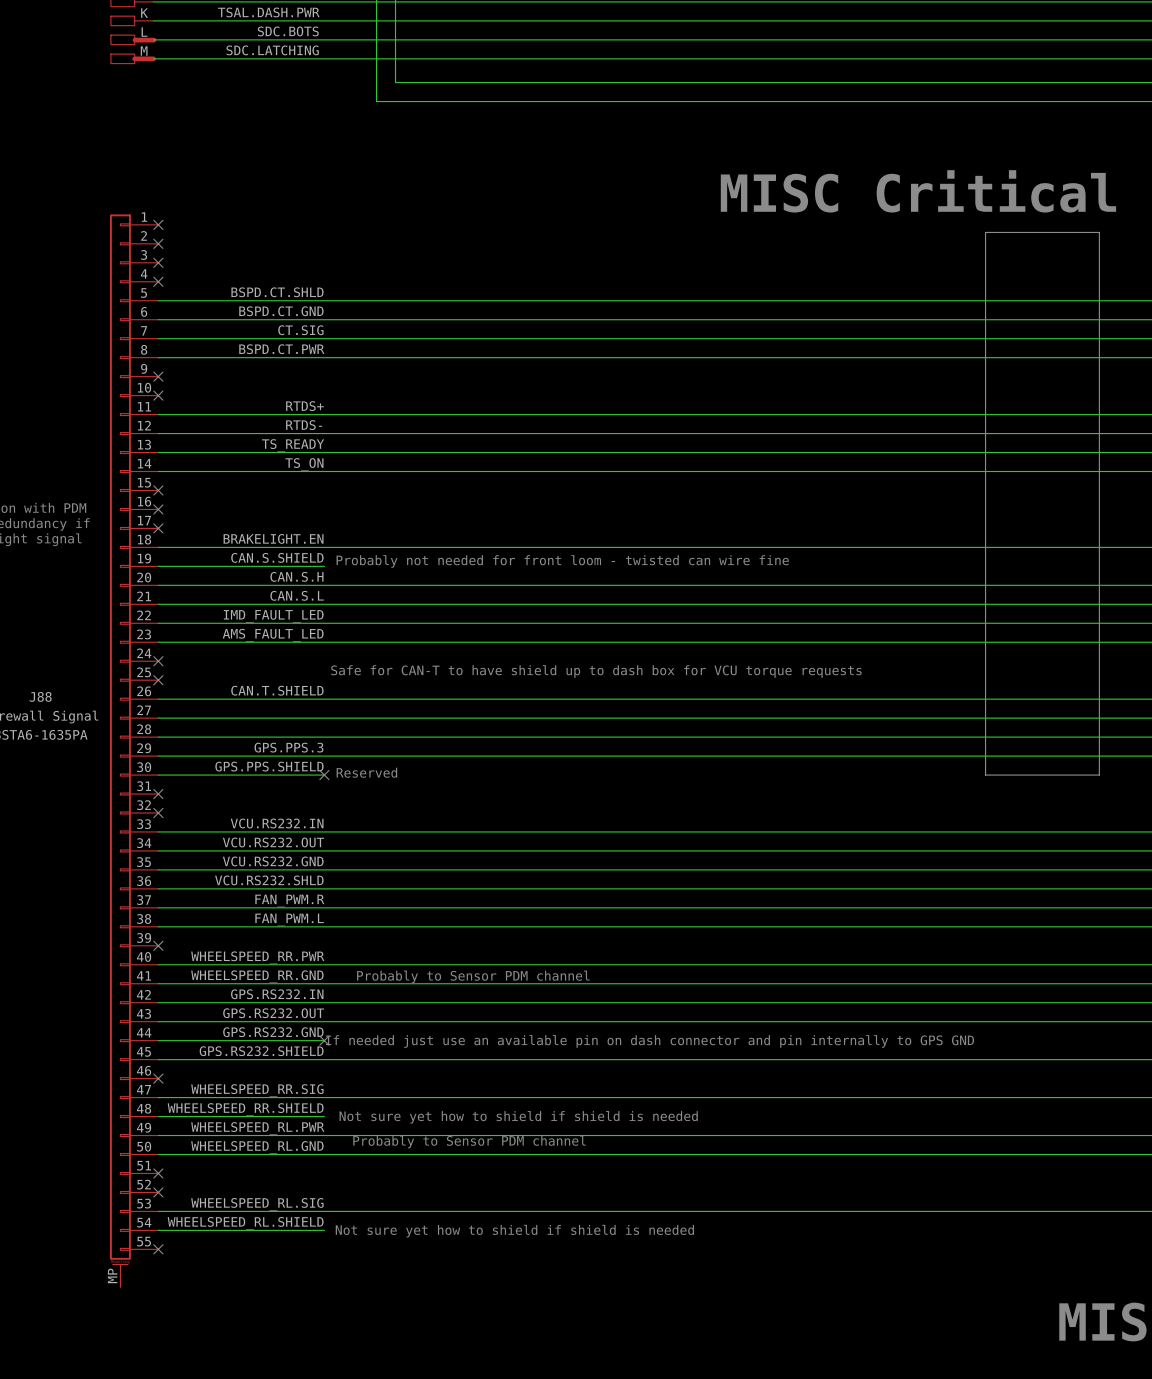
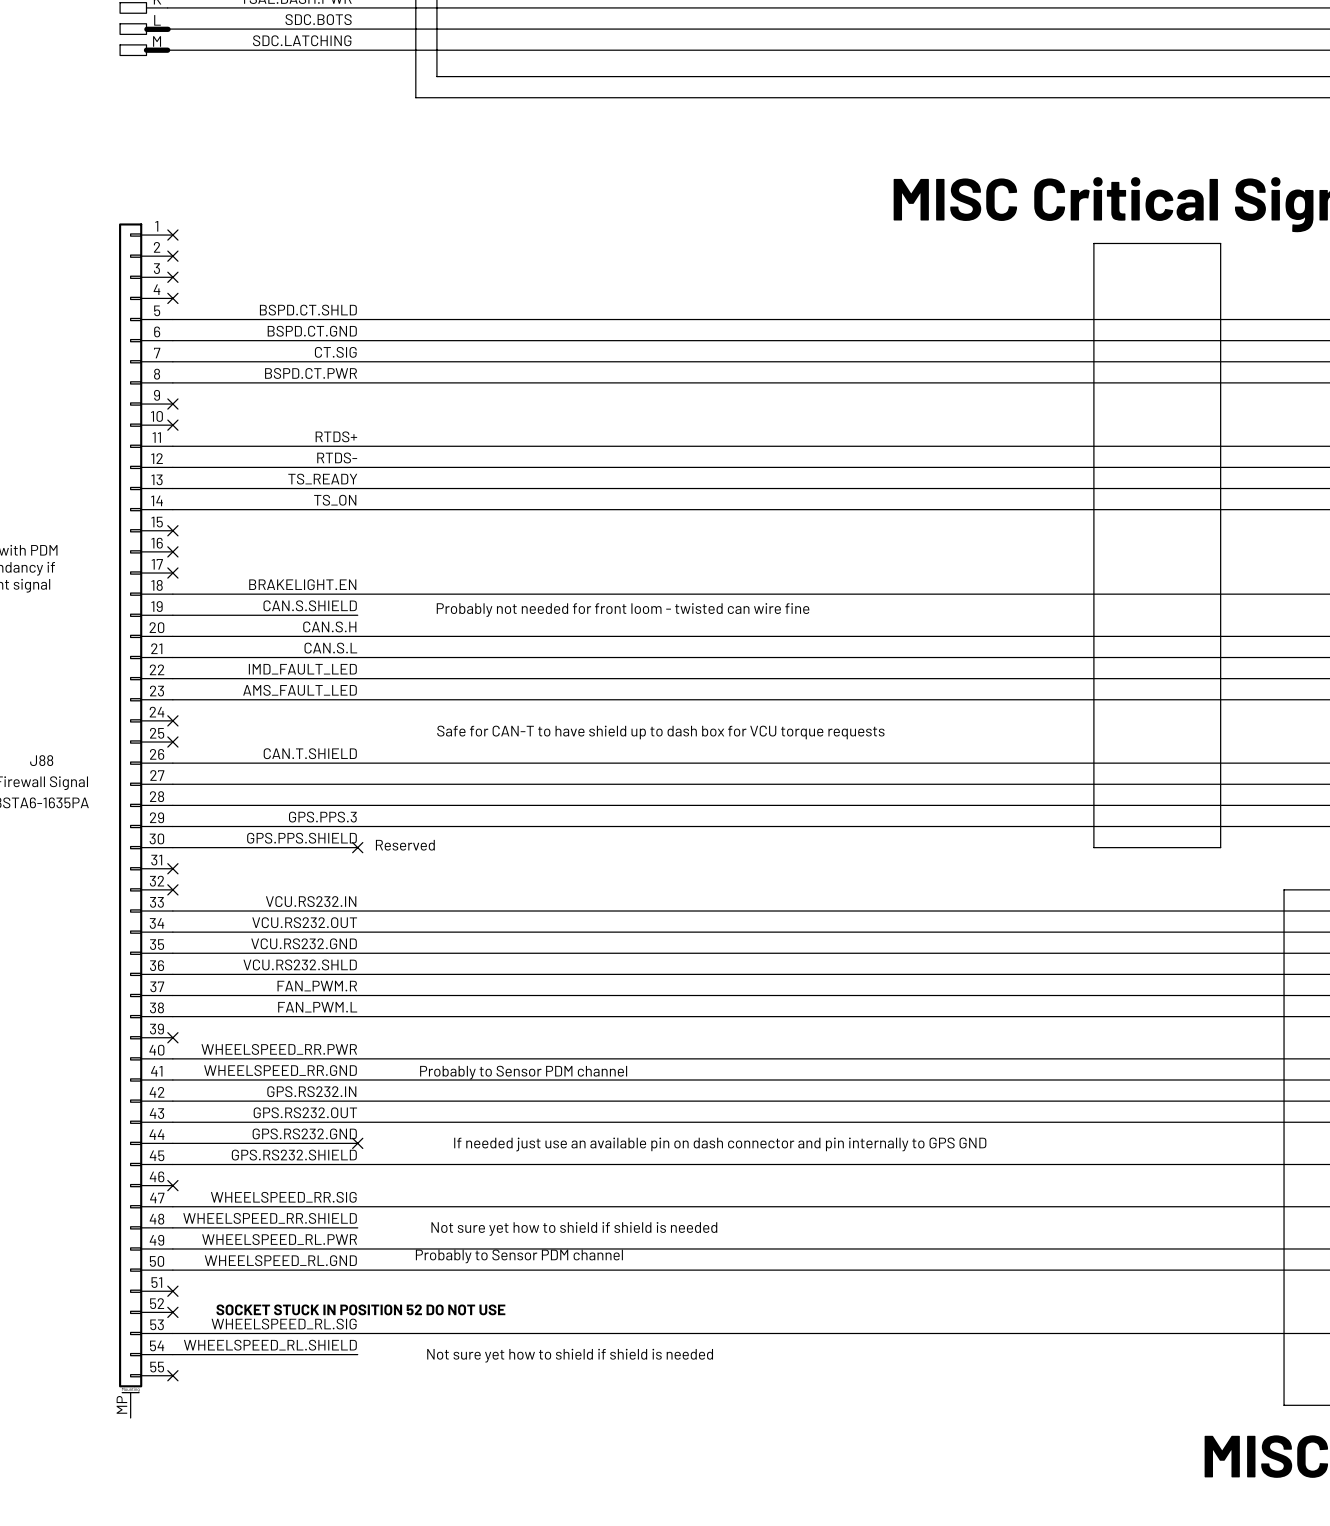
text: none -> SOCKET STUCK IN POSITION 52 DO NOT USE (360, 1309)

